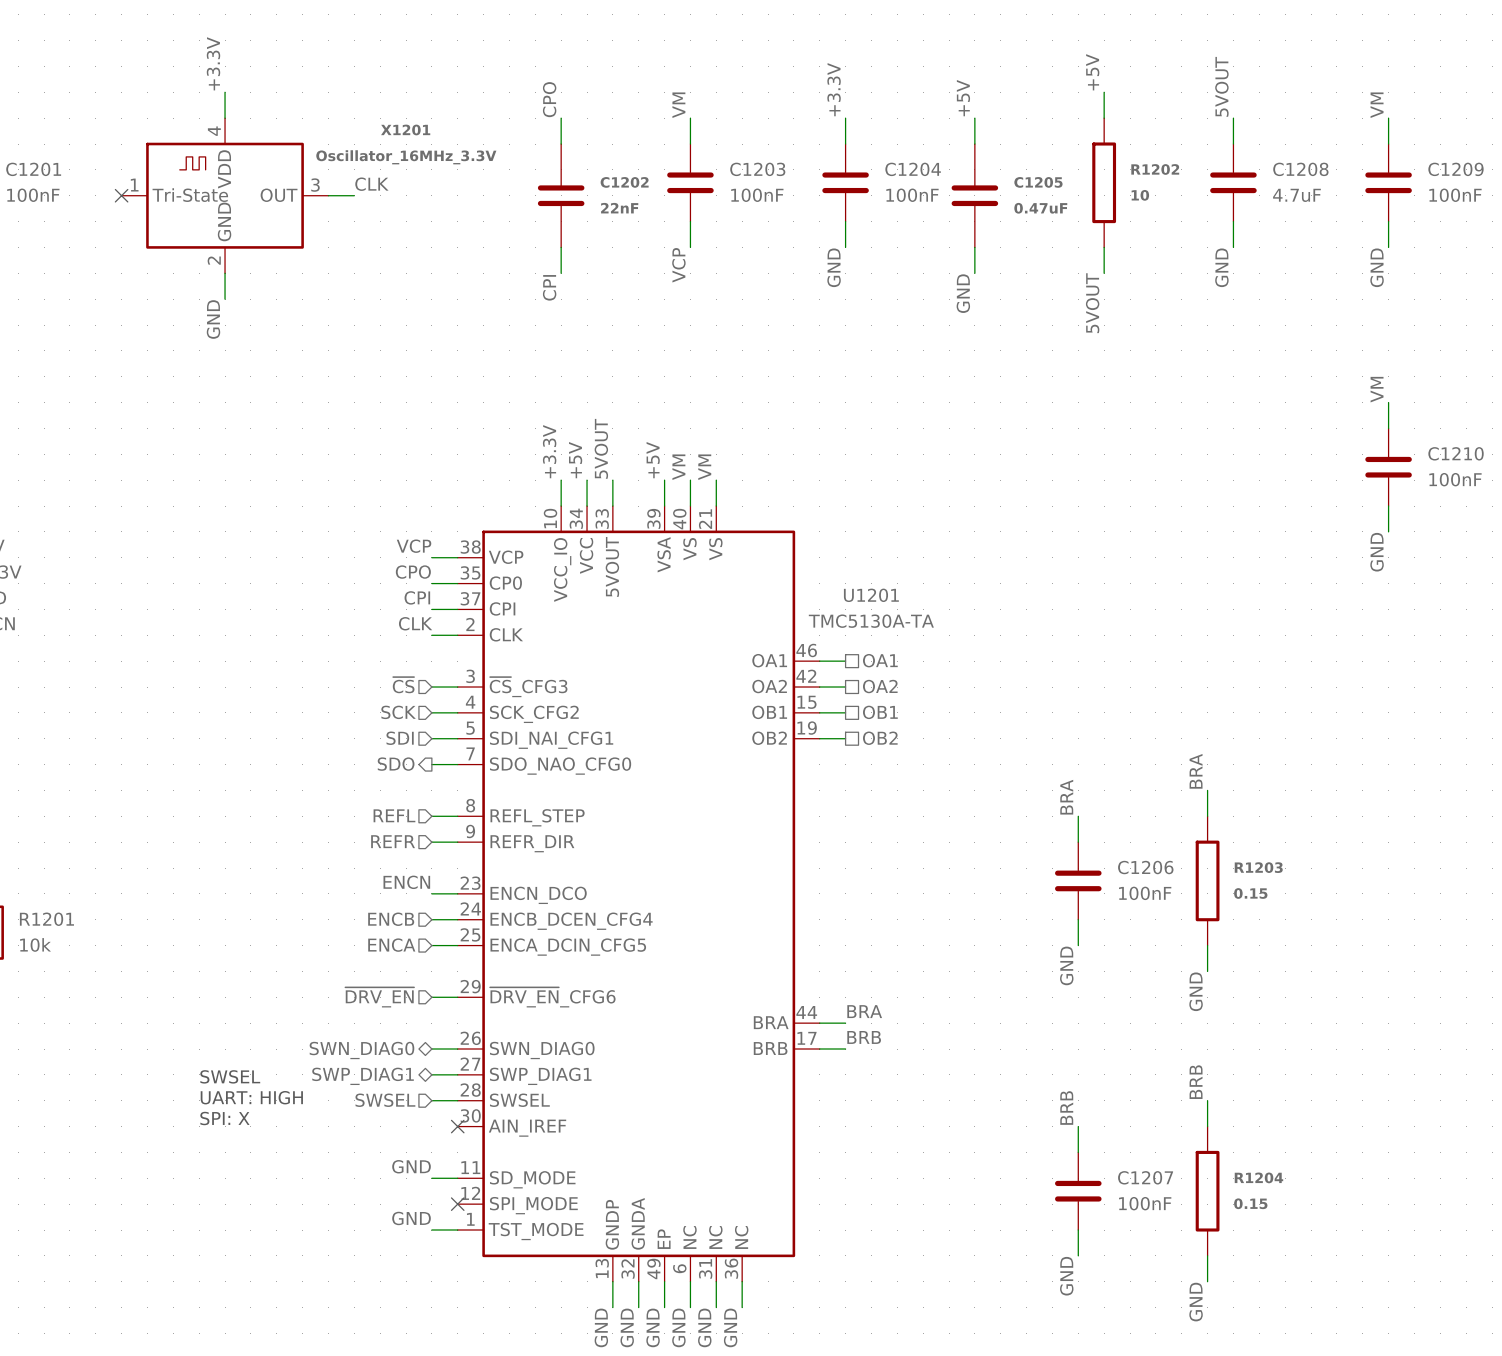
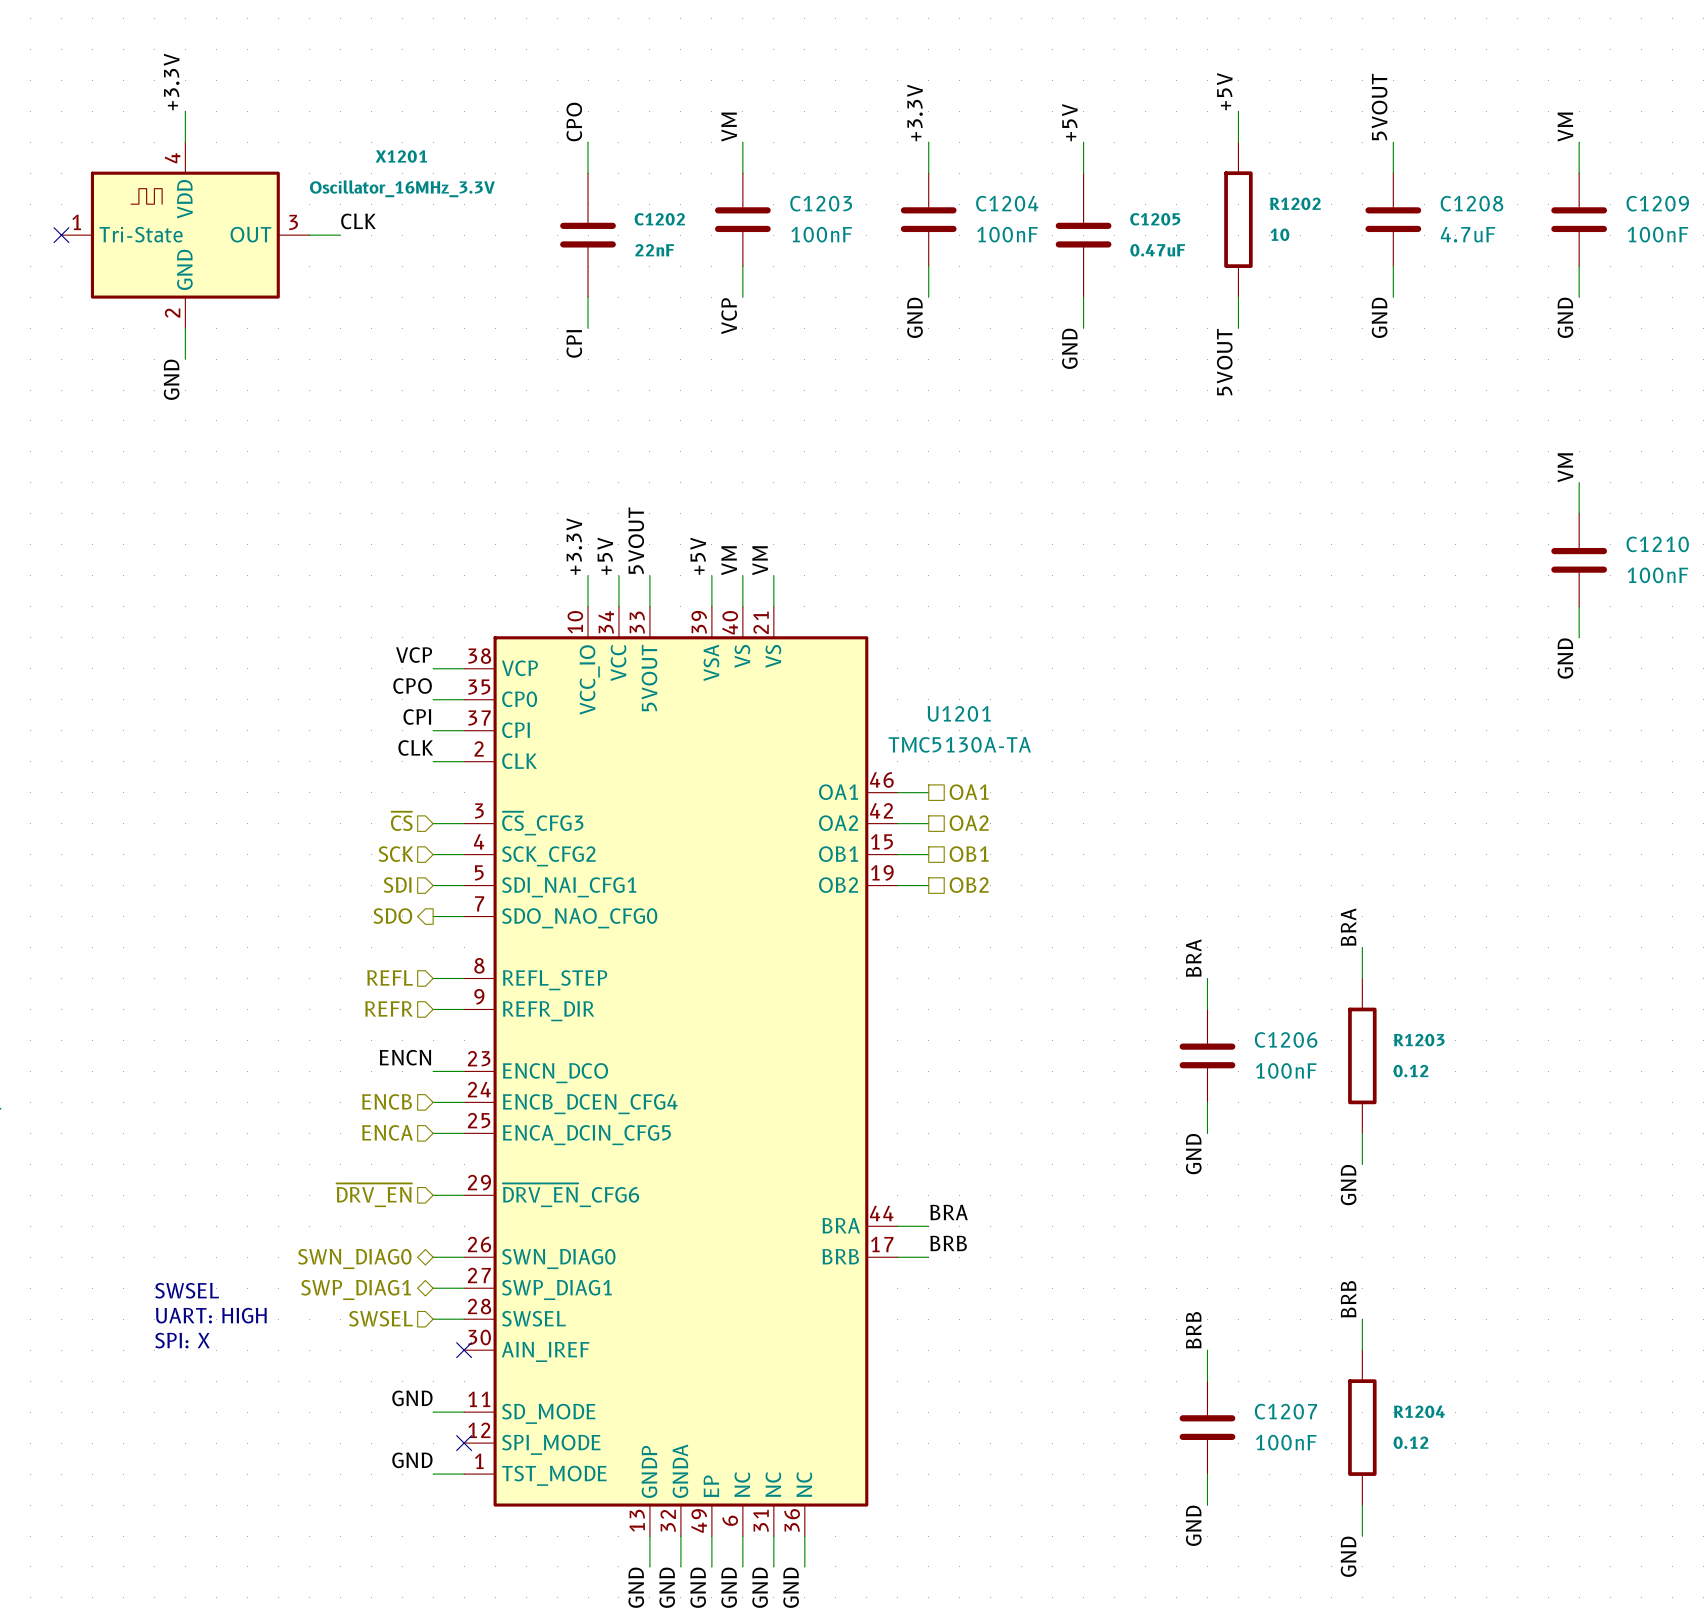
R1203 value: 0.15 (1250, 893) -> 0.12 (1411, 1071)
R1204 value: 0.15 (1250, 1203) -> 0.12 (1411, 1442)

